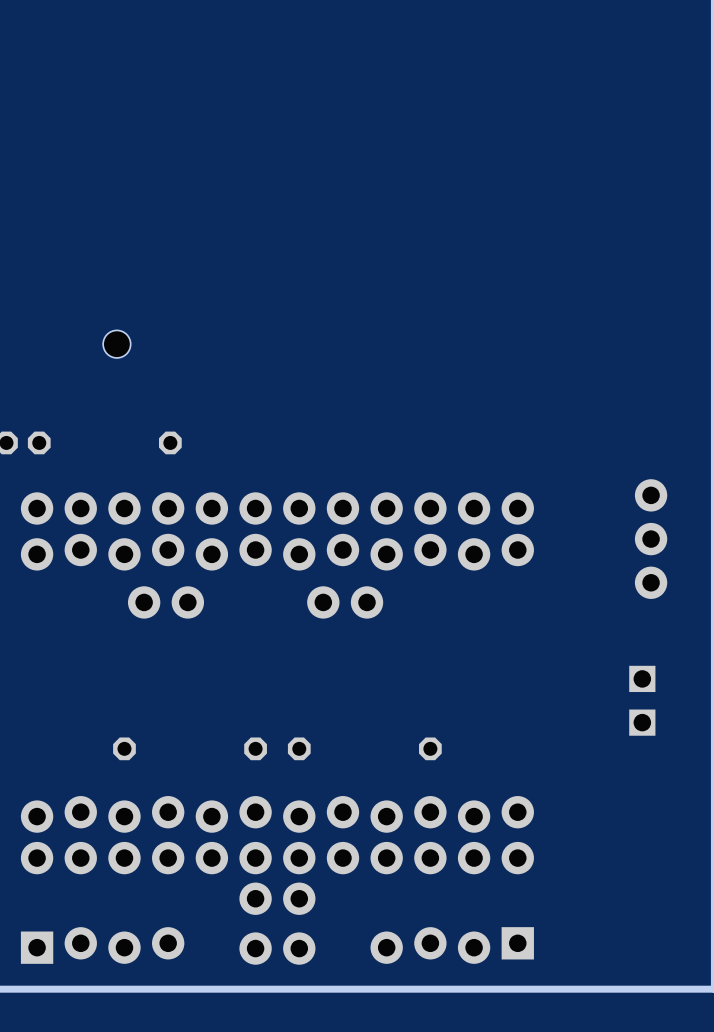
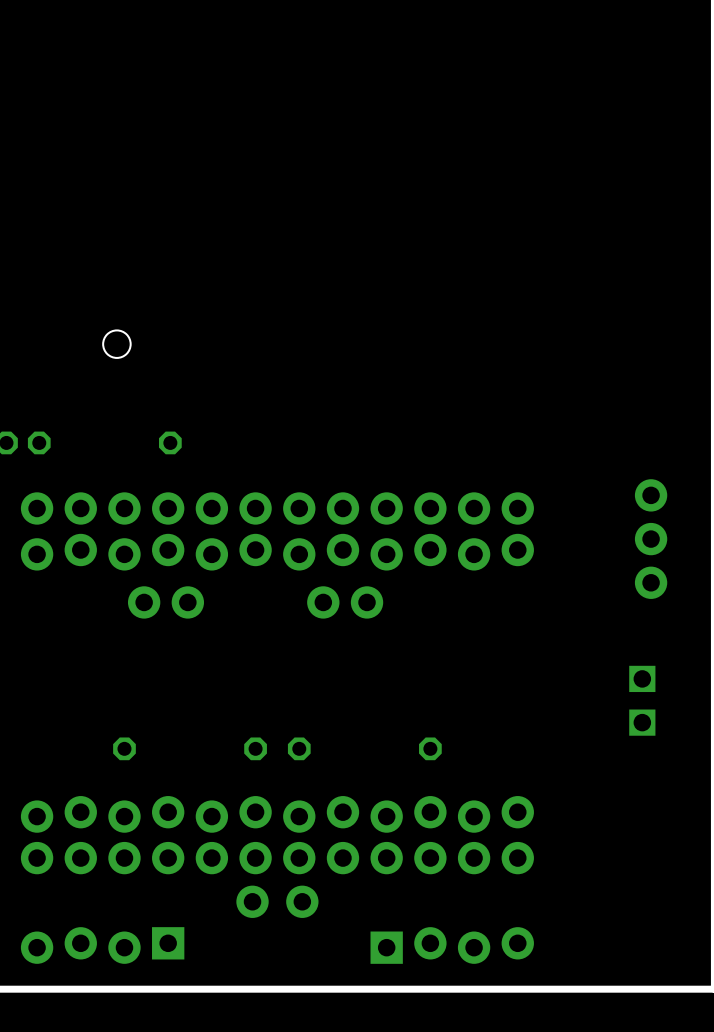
part: none -> (277, 901)
part: (255, 923) -> none
part: (299, 923) -> none
part rotation: 0° (102, 945) -> 180° (102, 945)
part rotation: 0° (452, 945) -> 180° (452, 945)

